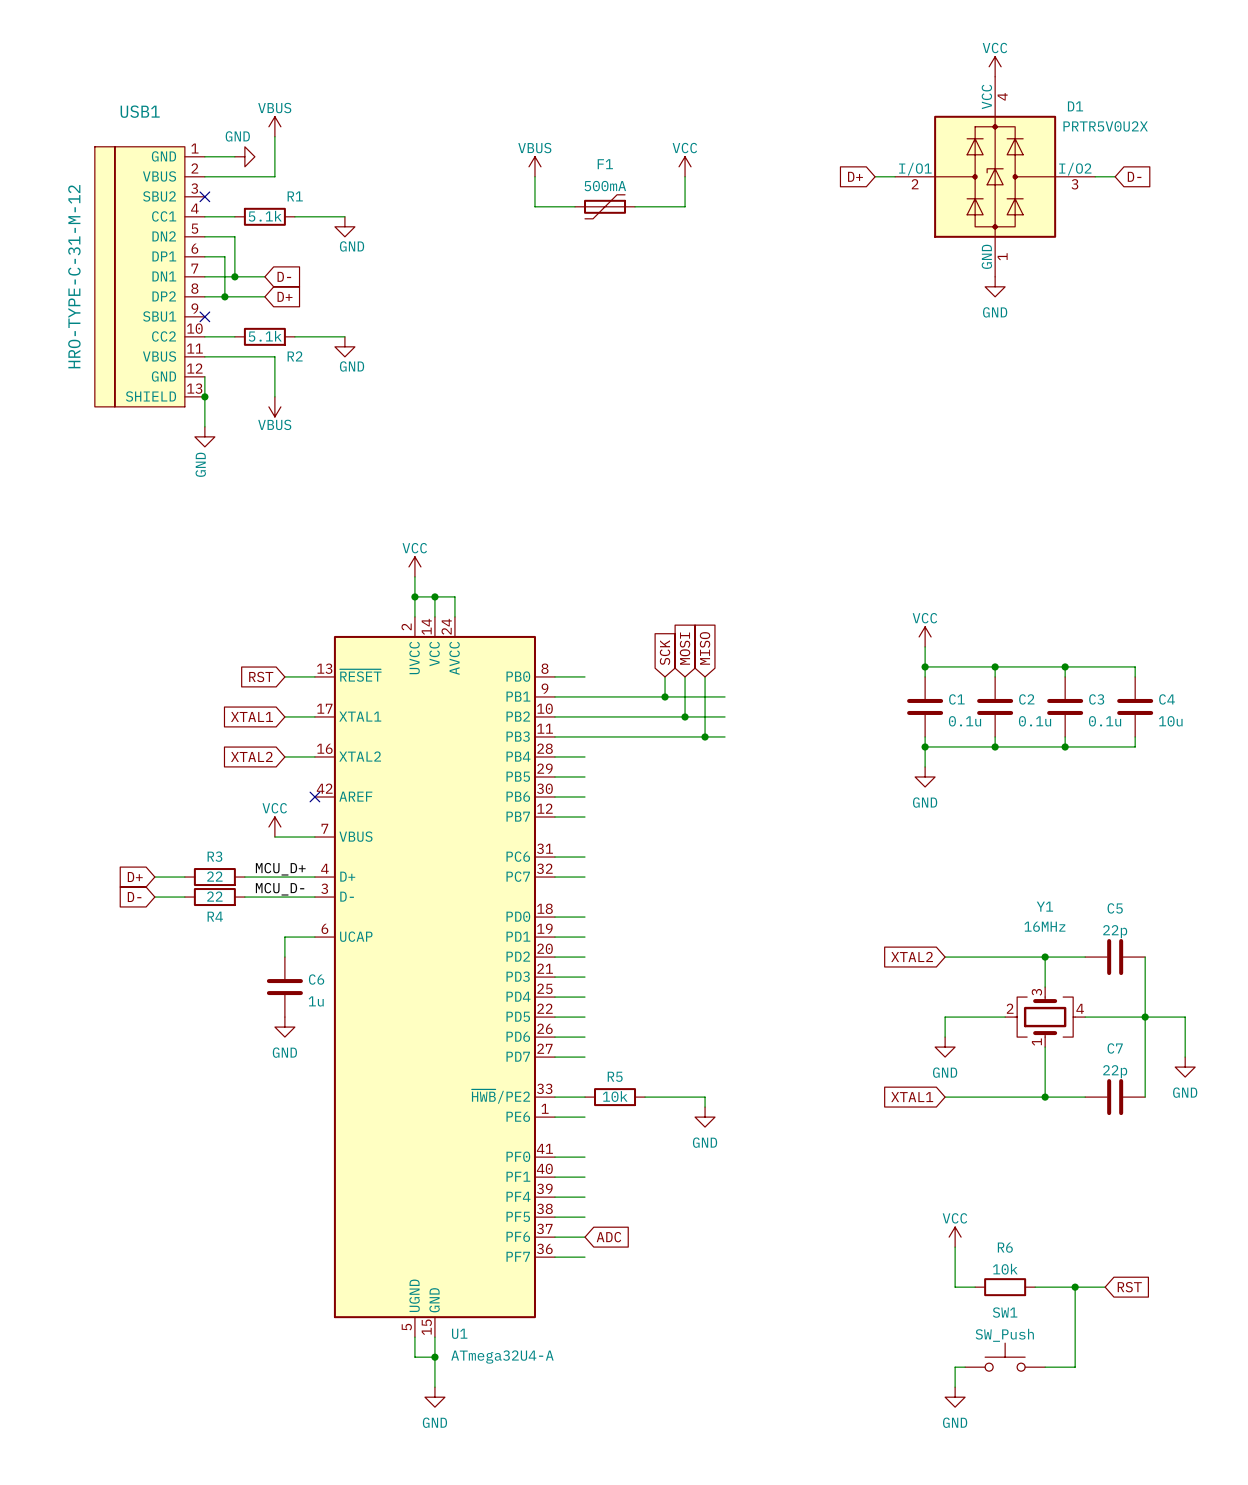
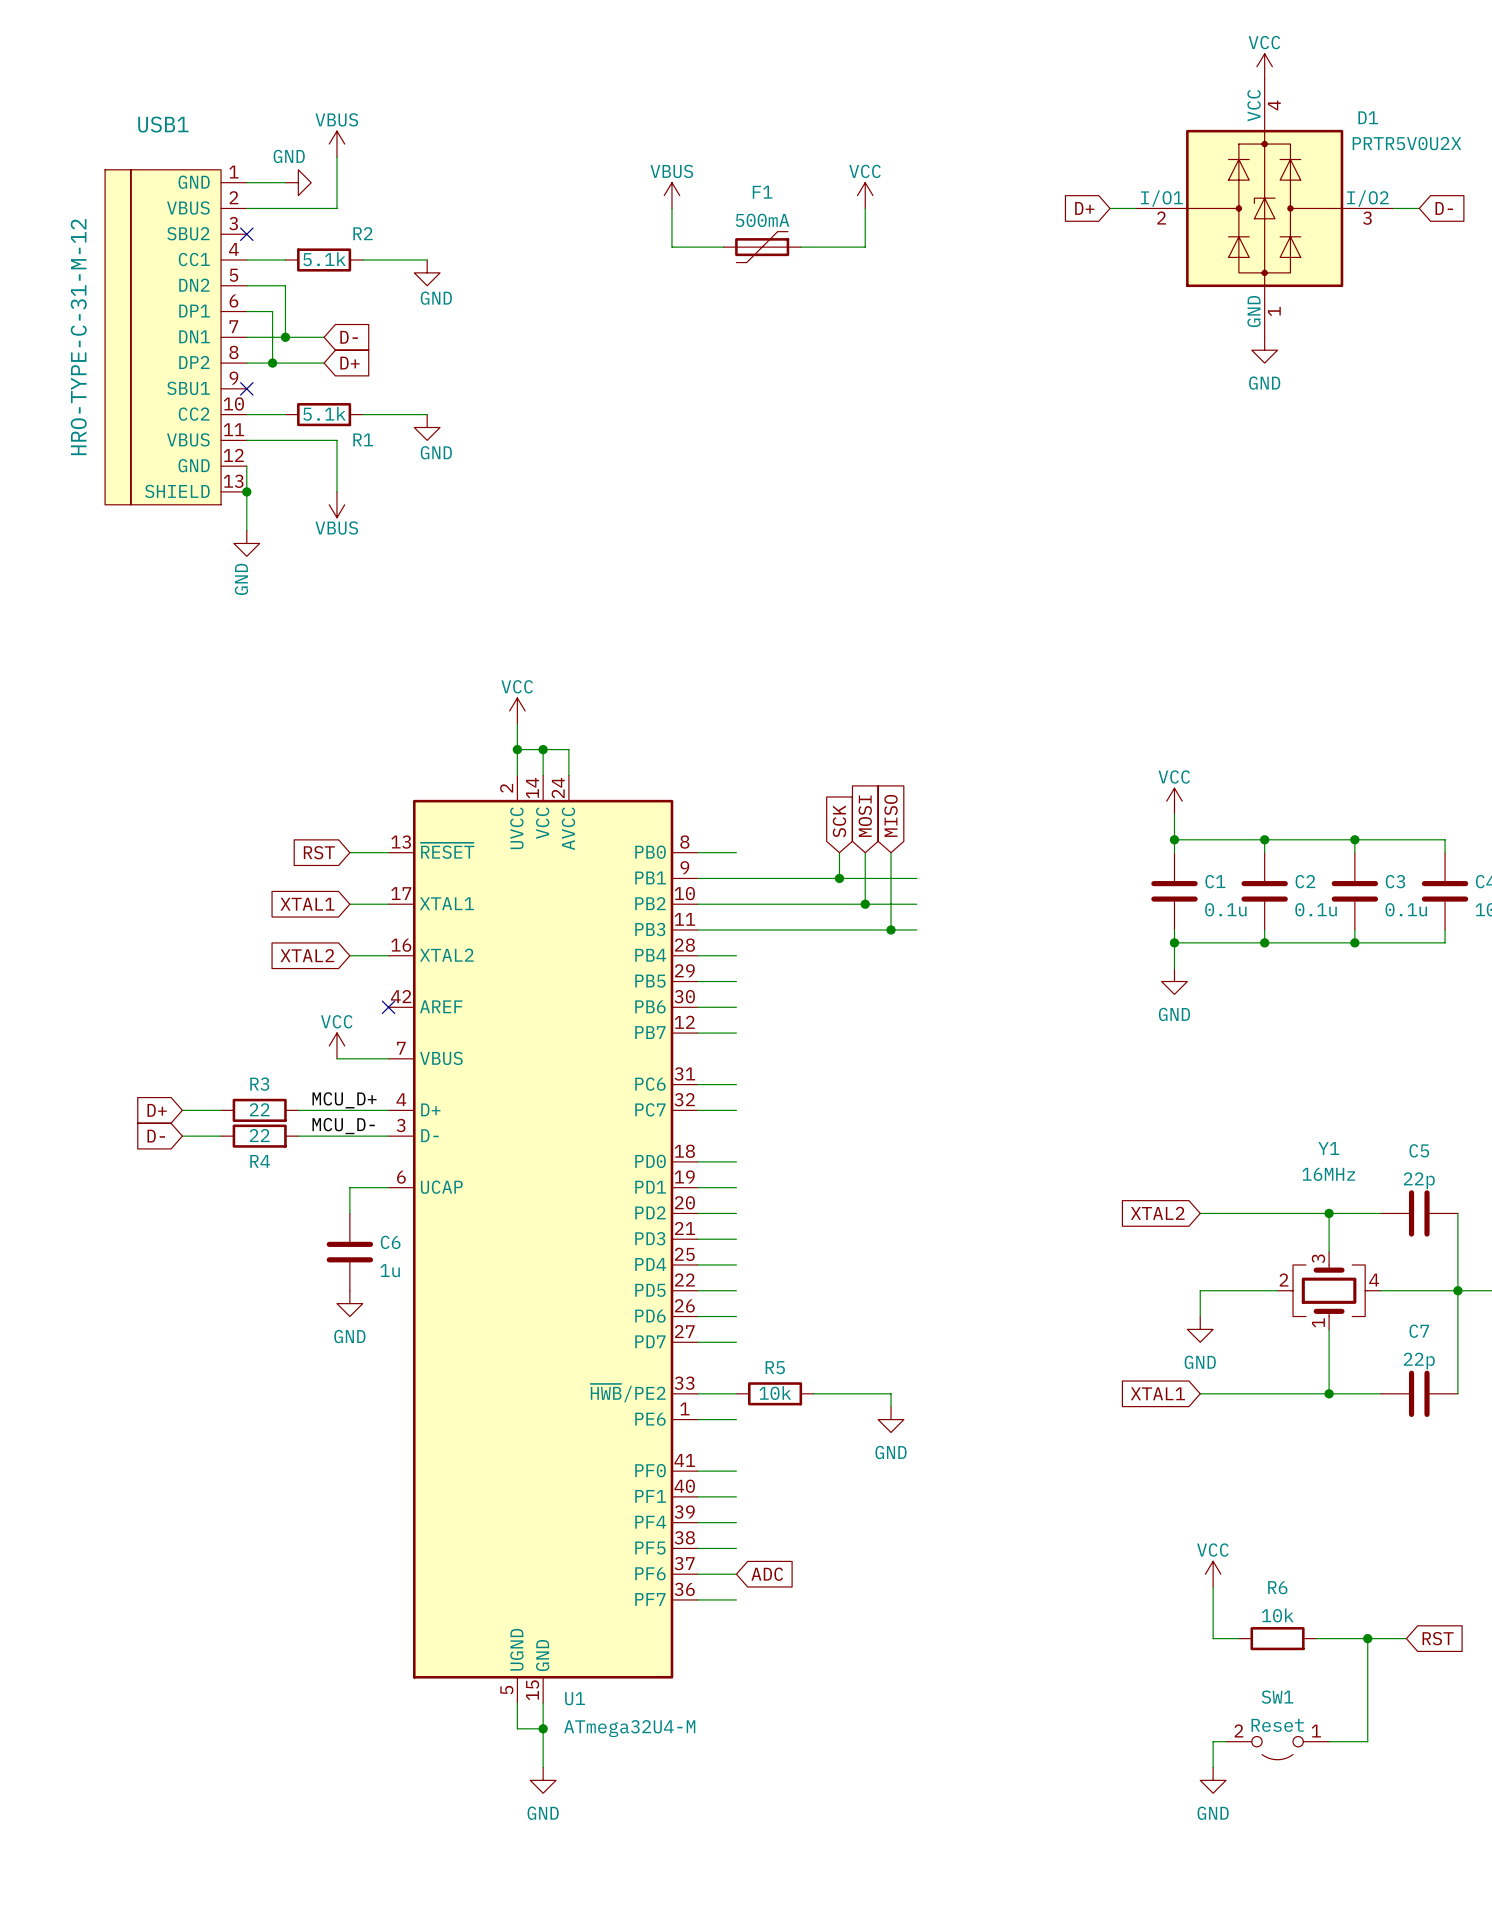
R1 name: R1 (295, 196) -> R2 (363, 233)
R2 name: R2 (295, 356) -> R1 (363, 439)
SW1 value: SW_Push (1004, 1335) -> Reset (1277, 1725)
SW1 symbol: [965, 1343, 1046, 1372] -> [1226, 1736, 1330, 1760]
U1 value: ATmega32U4-A (502, 1357) -> ATmega32U4-M (629, 1728)

